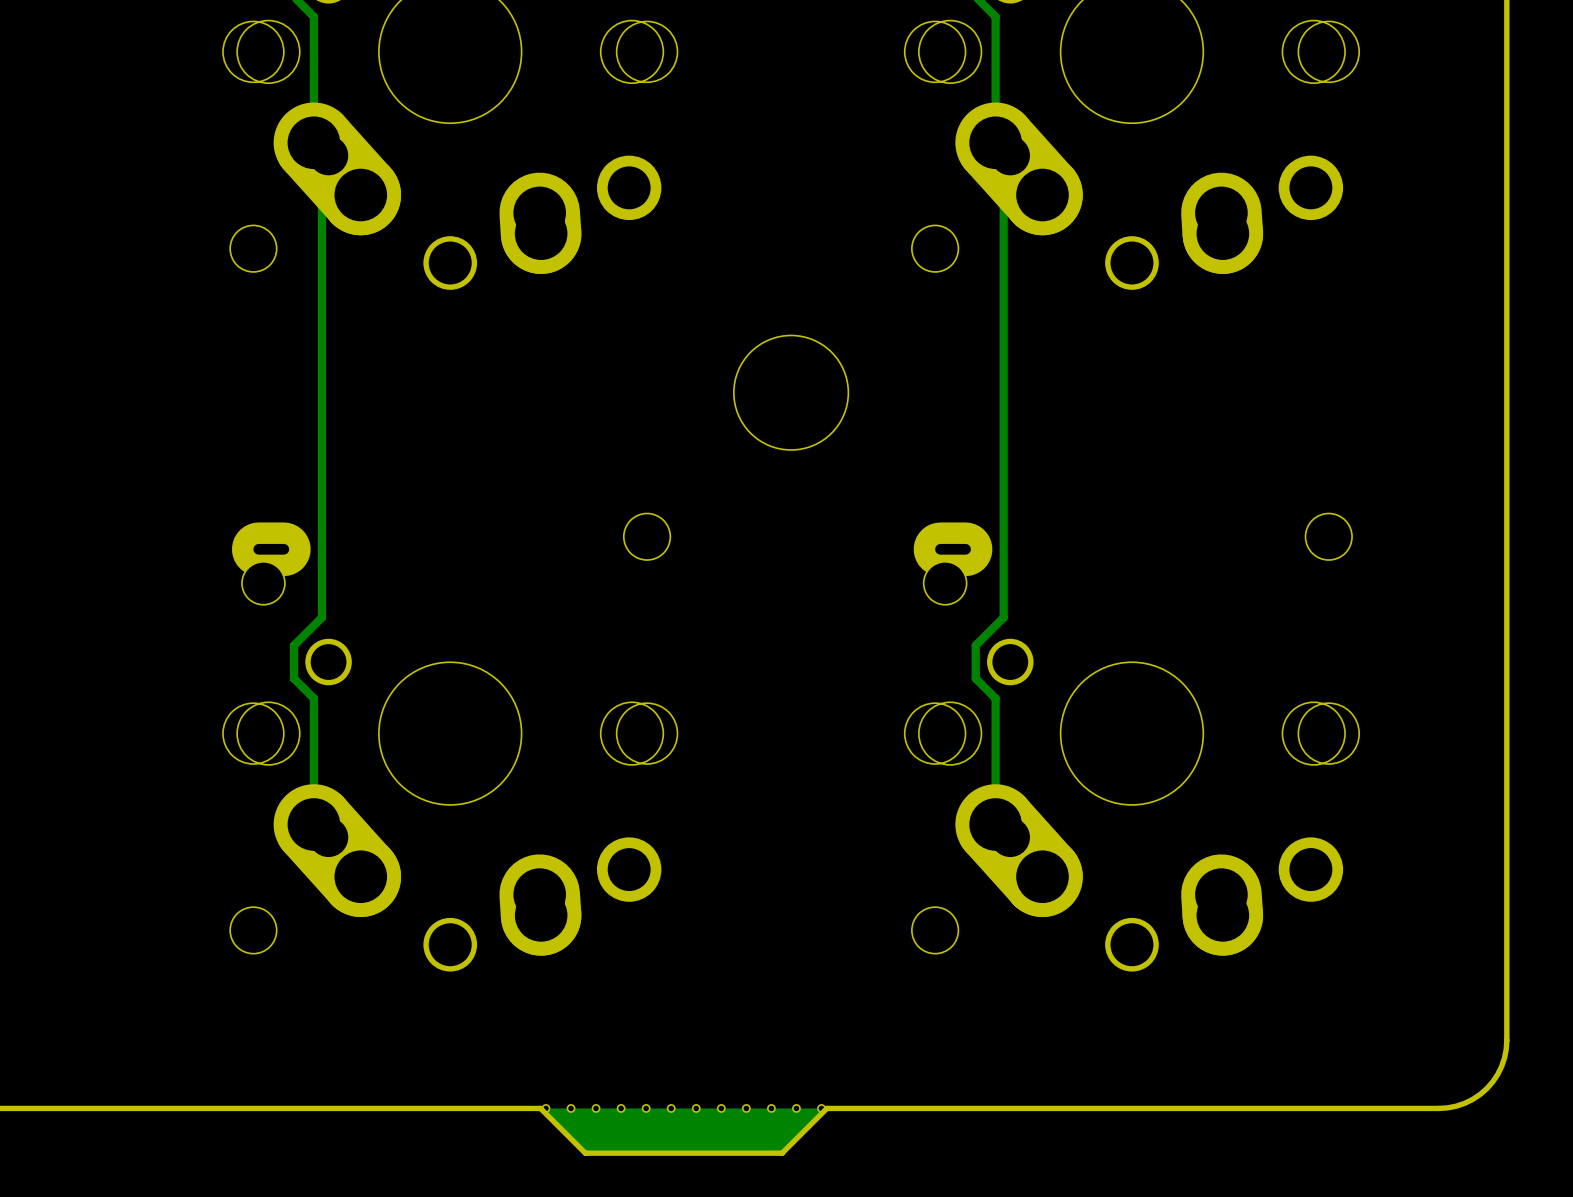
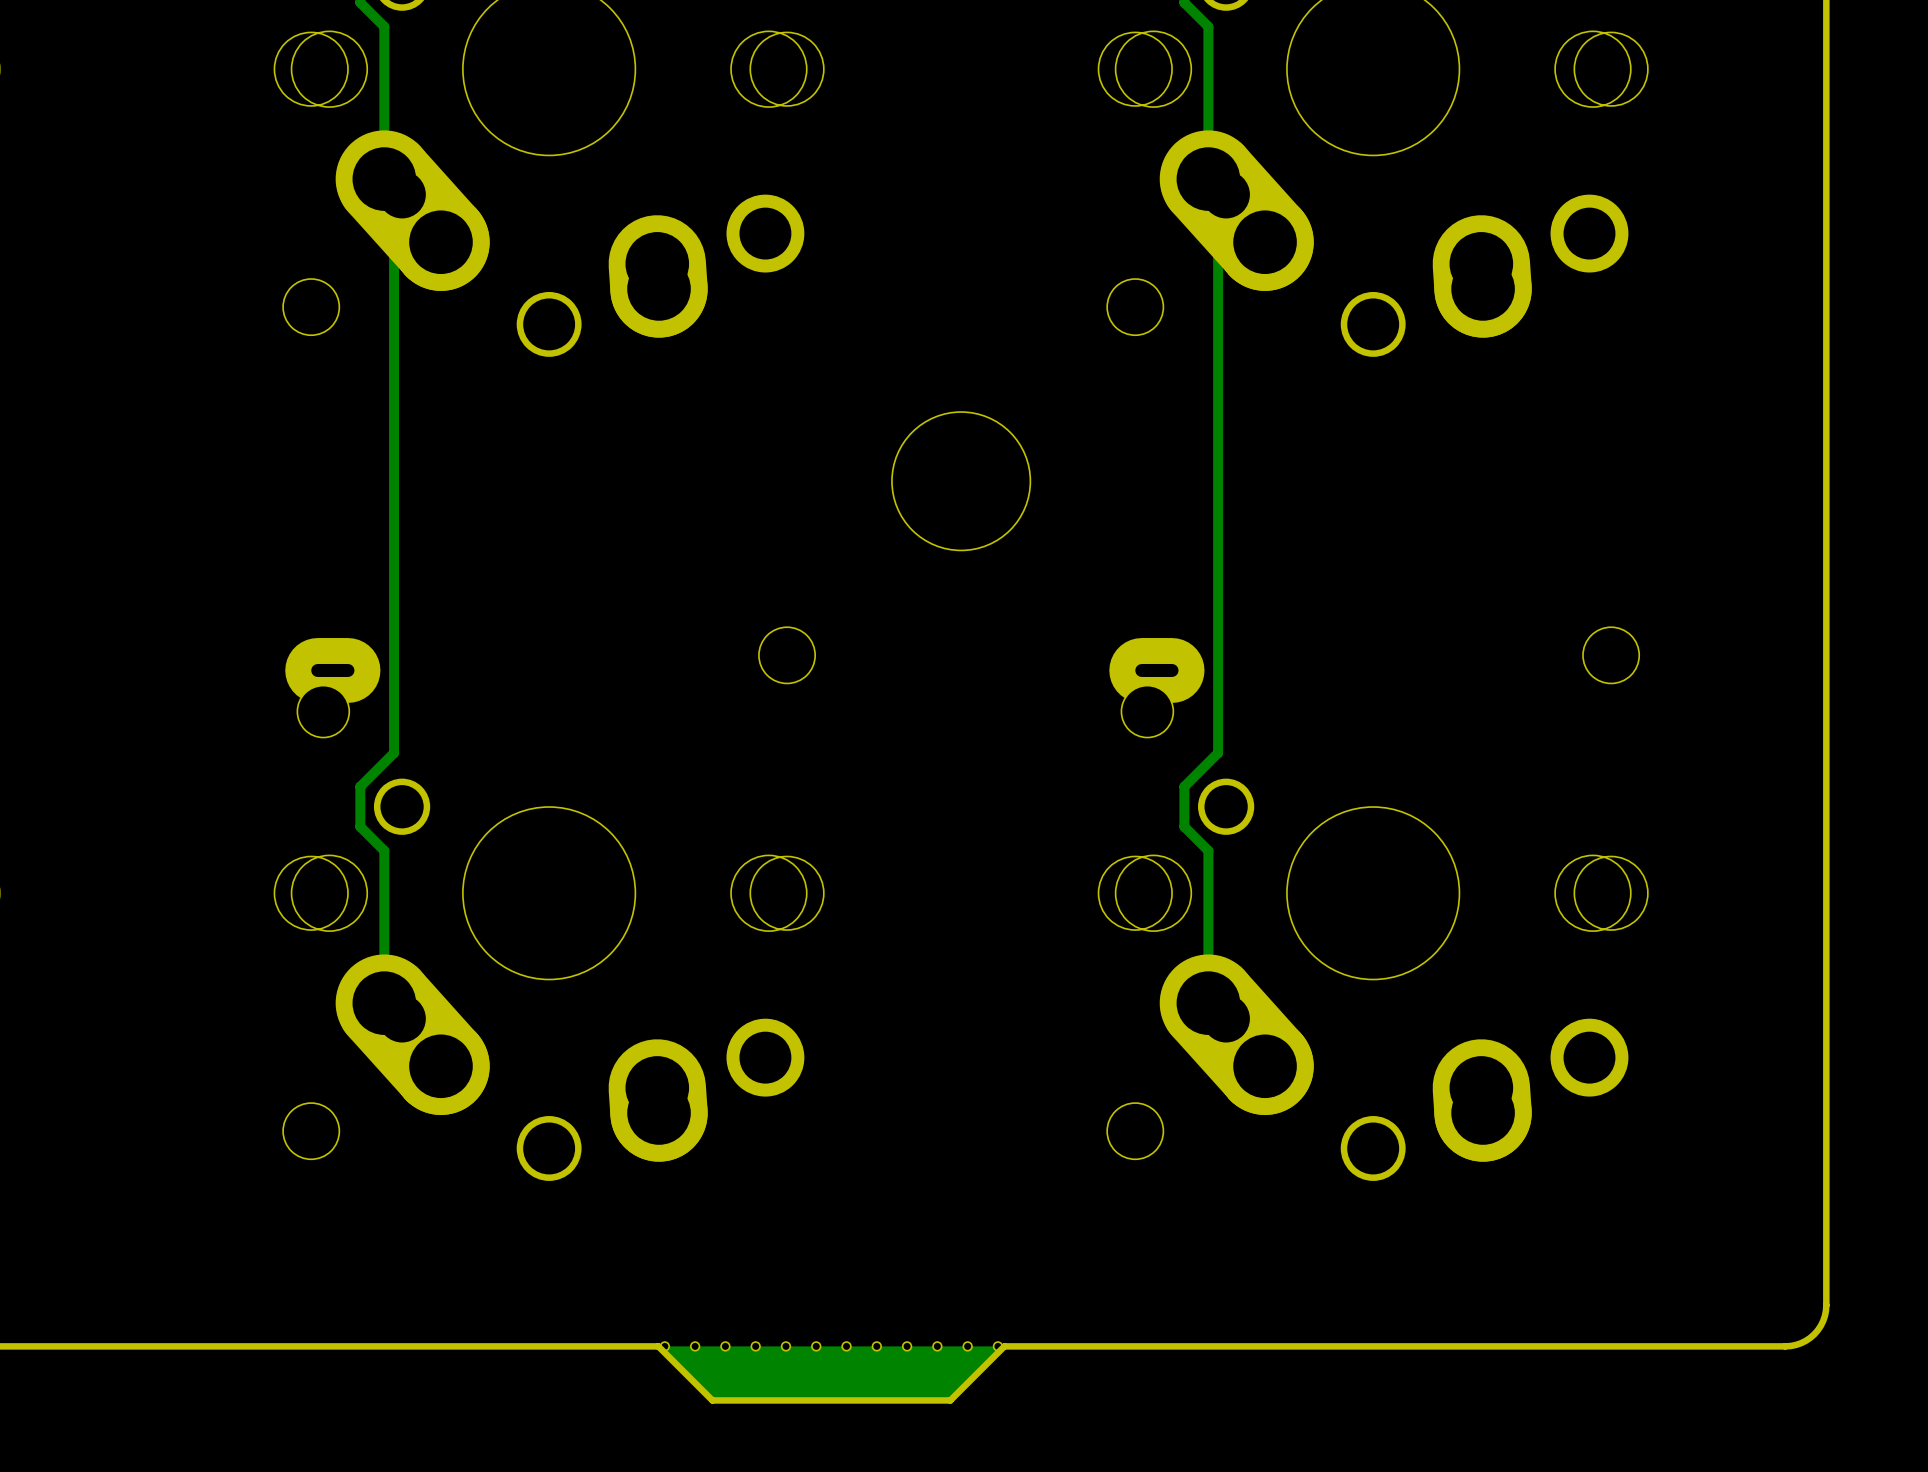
board edge: (1506, 1040) (1501, 1066) (1486, 1088) (1464, 1103) (1438, 1108) -> (1826, 1264) (1825, 1310) (1820, 1325) (1805, 1340) (1785, 1346)
board edge: none -> (1785, 1346) (1744, 1346)

